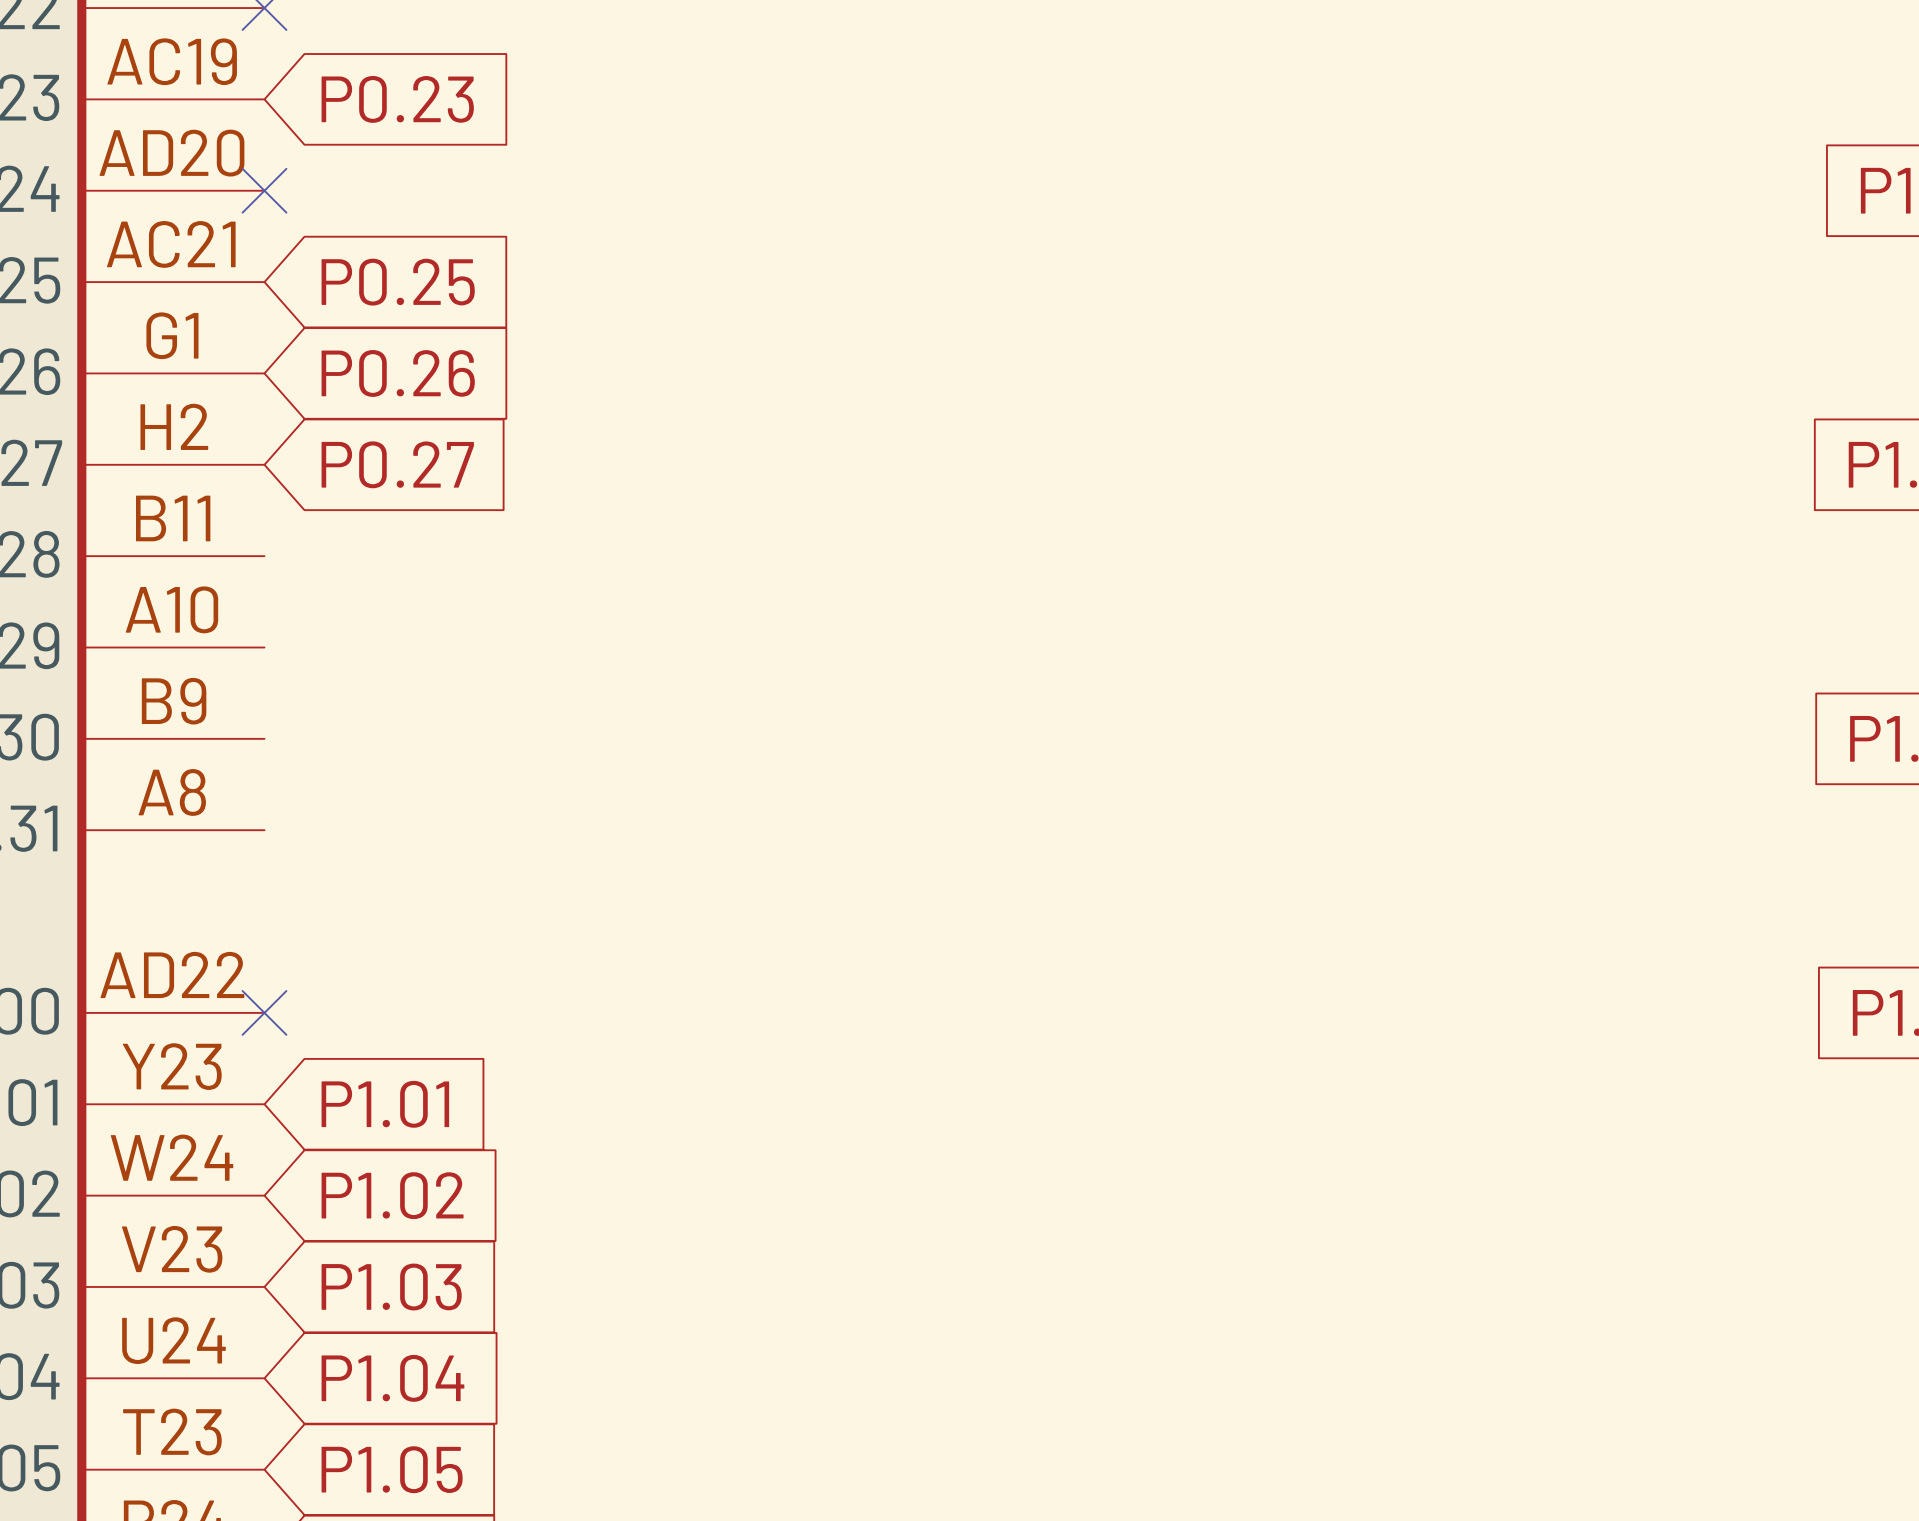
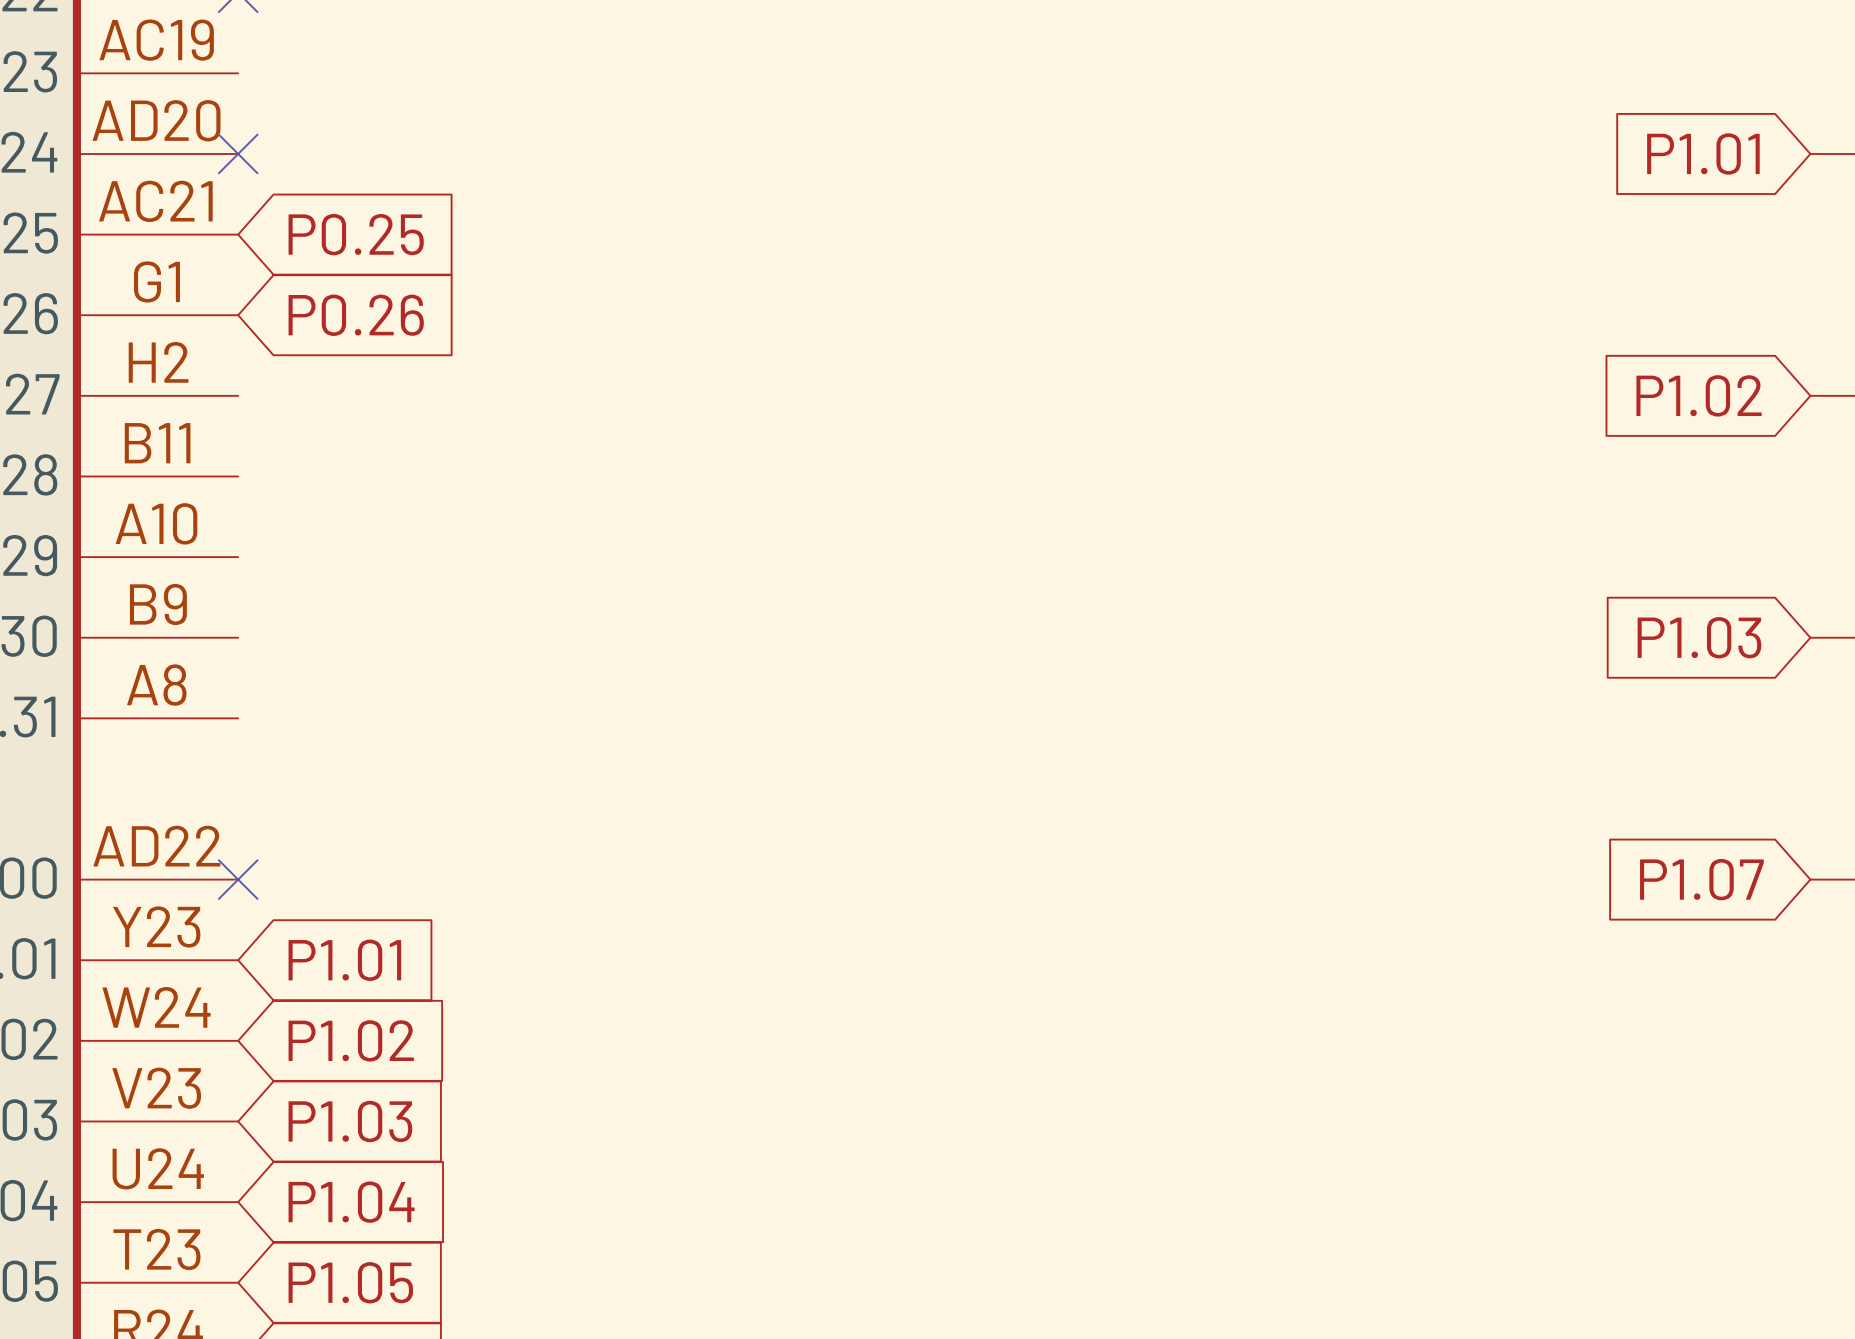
global label: P0.23 (397, 99) -> none
global label: P0.27 (397, 464) -> none

